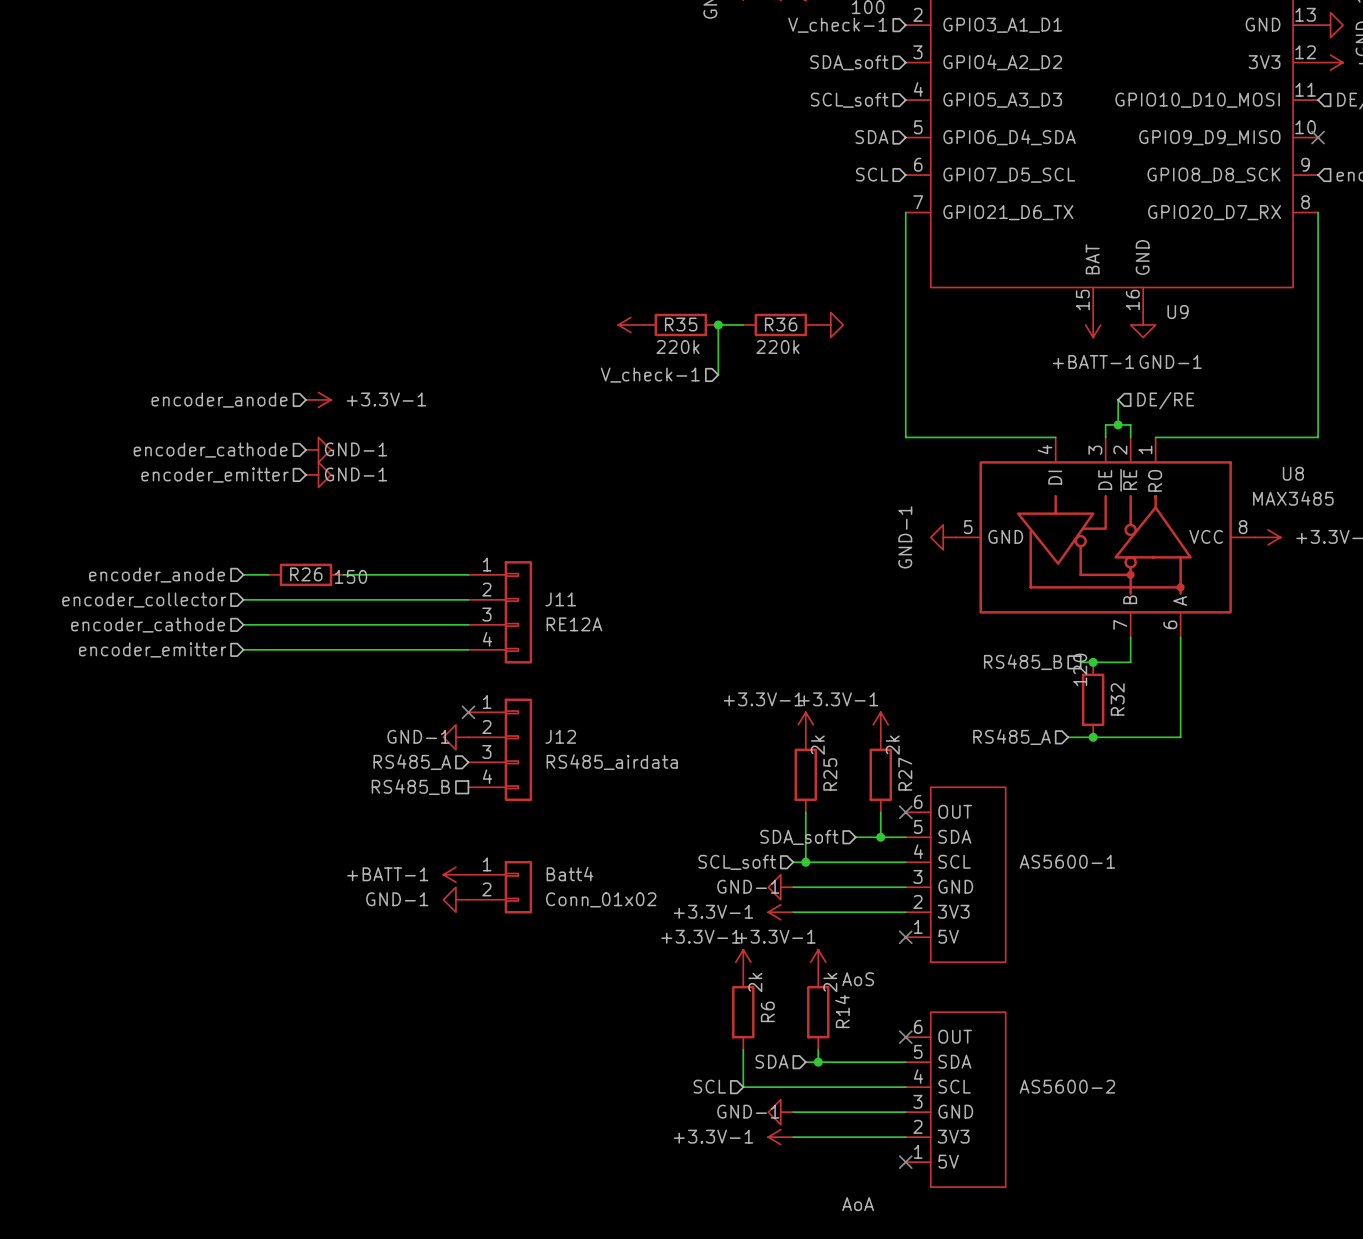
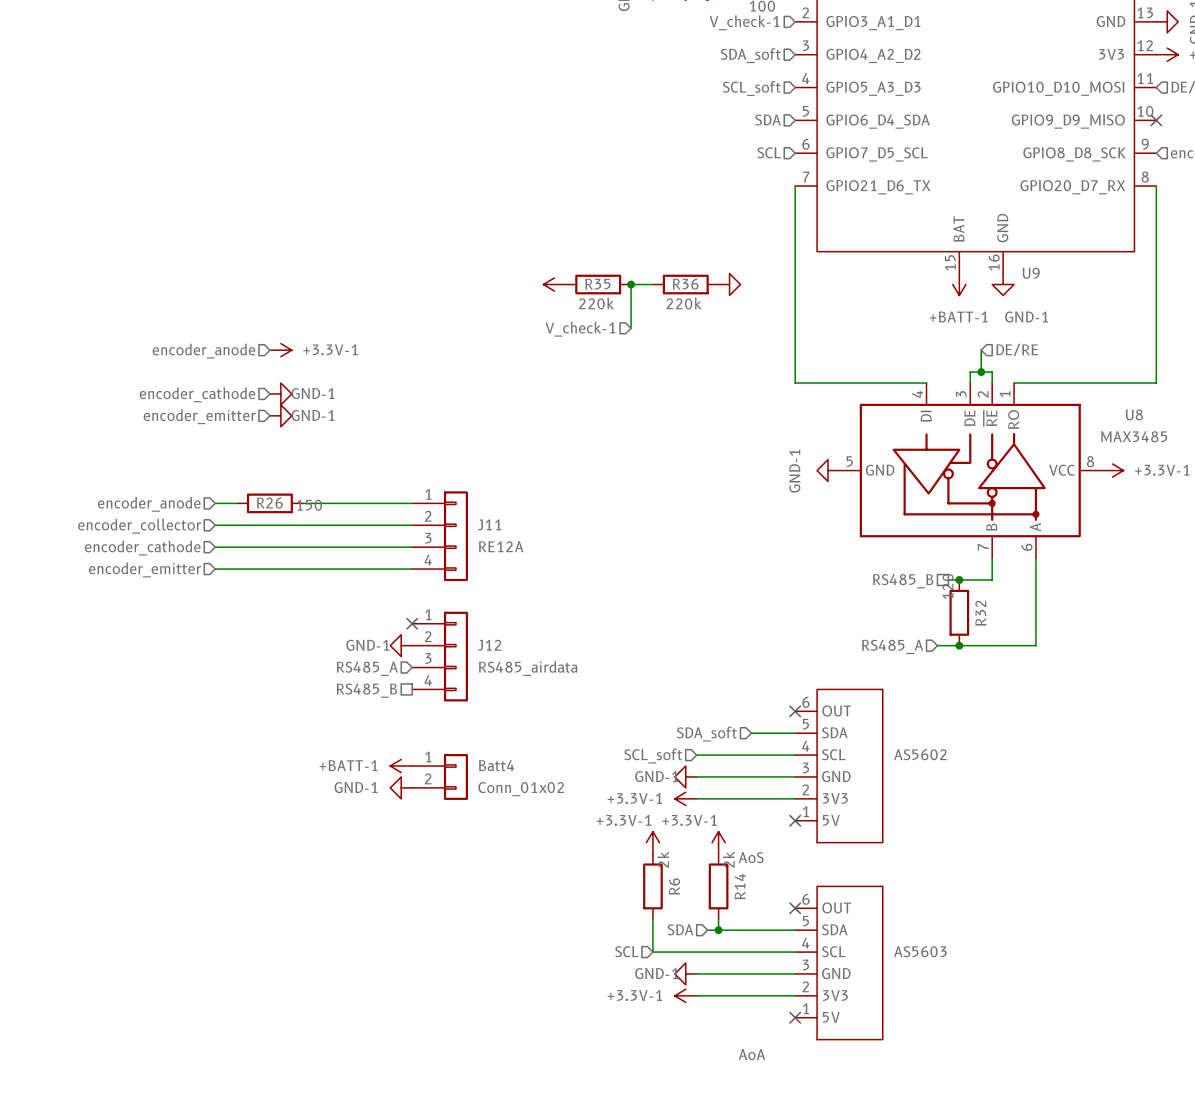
power symbol: +3.3V-1 (805, 724) -> none
power symbol: +3.3V-1 (880, 724) -> none
R25: 2k (805, 774) -> none
R27: 2k (880, 774) -> none
wire: (805, 812) (805, 862) -> none
wire: (880, 812) (880, 837) -> none
junction: (880, 837) -> none
AS5600-1 name: AS5600-1 (1067, 861) -> AS5602 (920, 754)
junction: (805, 862) -> none
AS5600-2 name: AS5600-2 (1067, 1086) -> AS5603 (920, 951)

